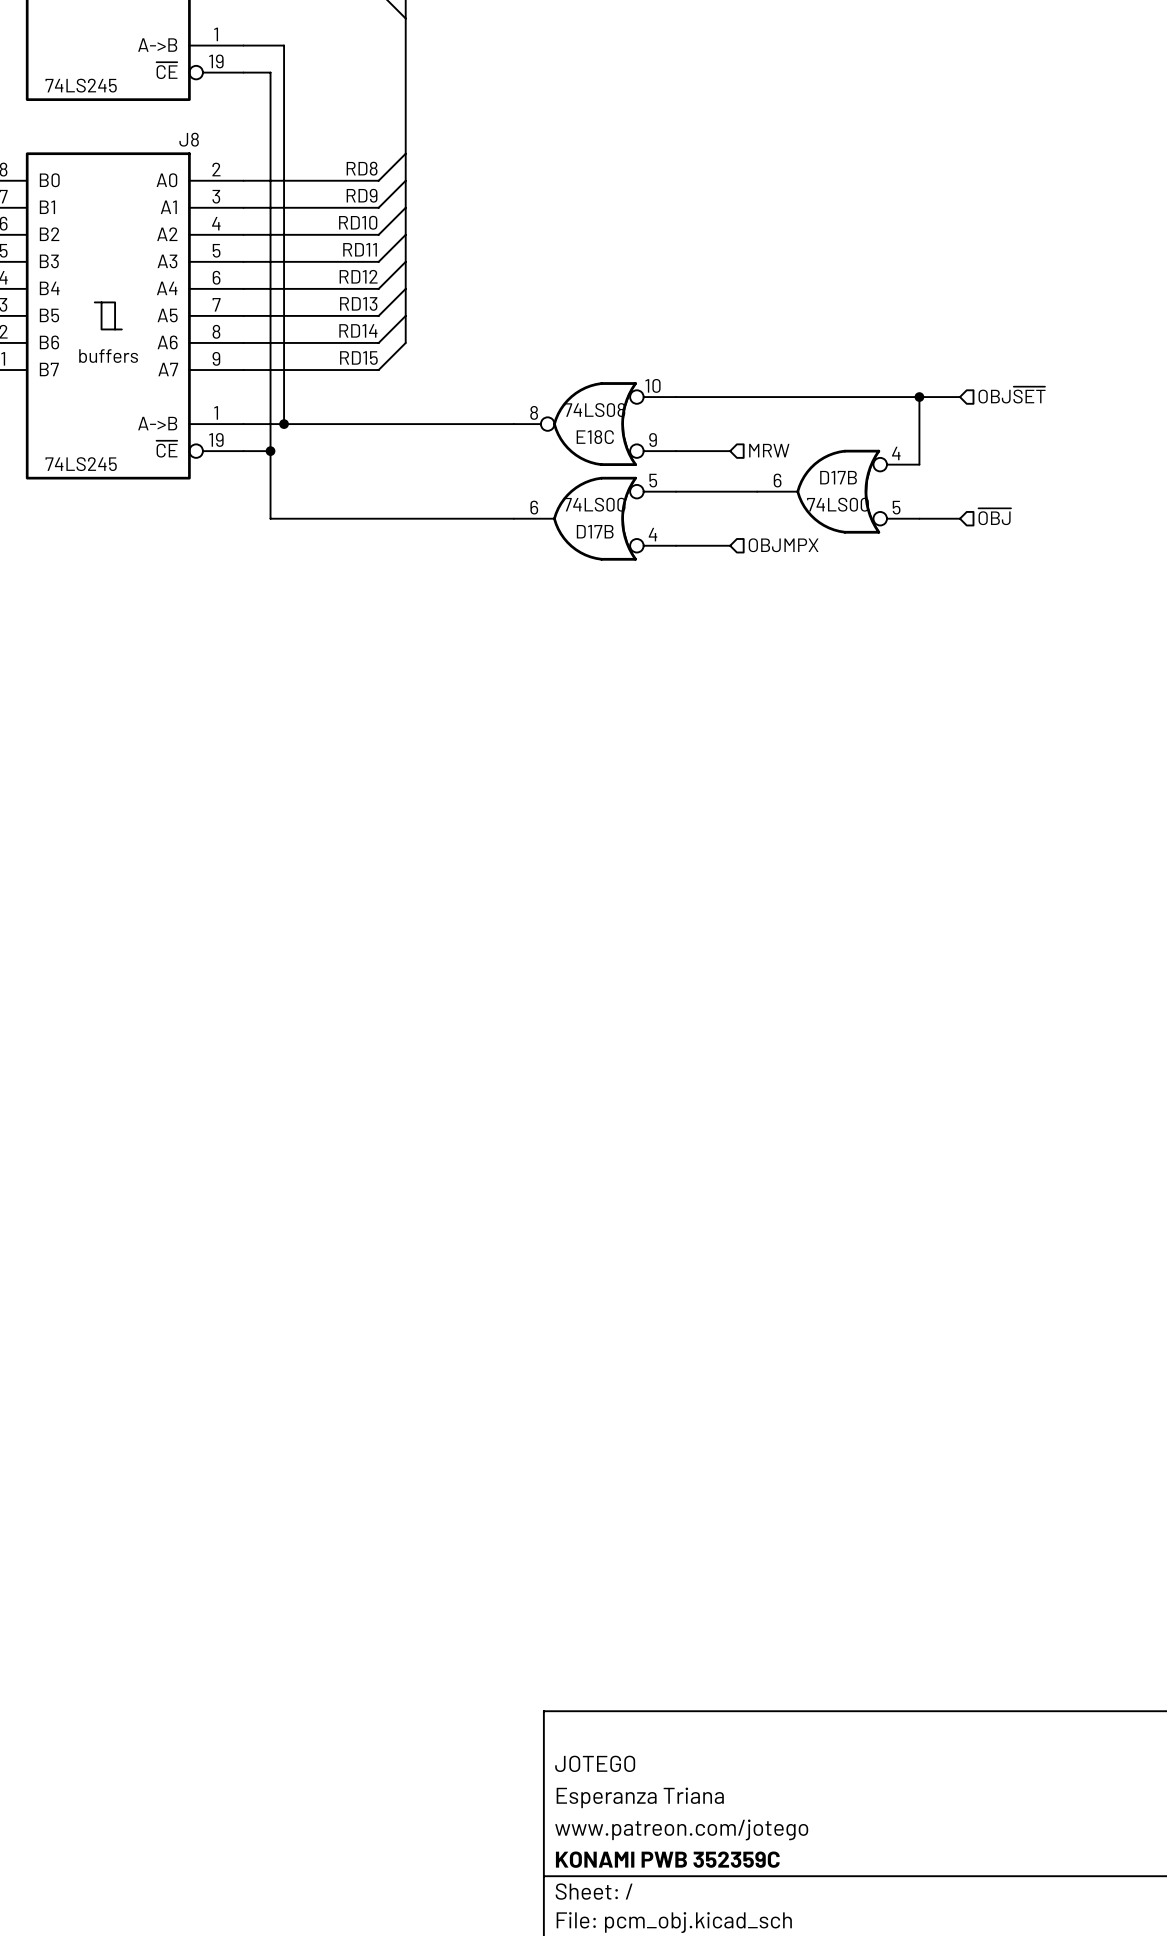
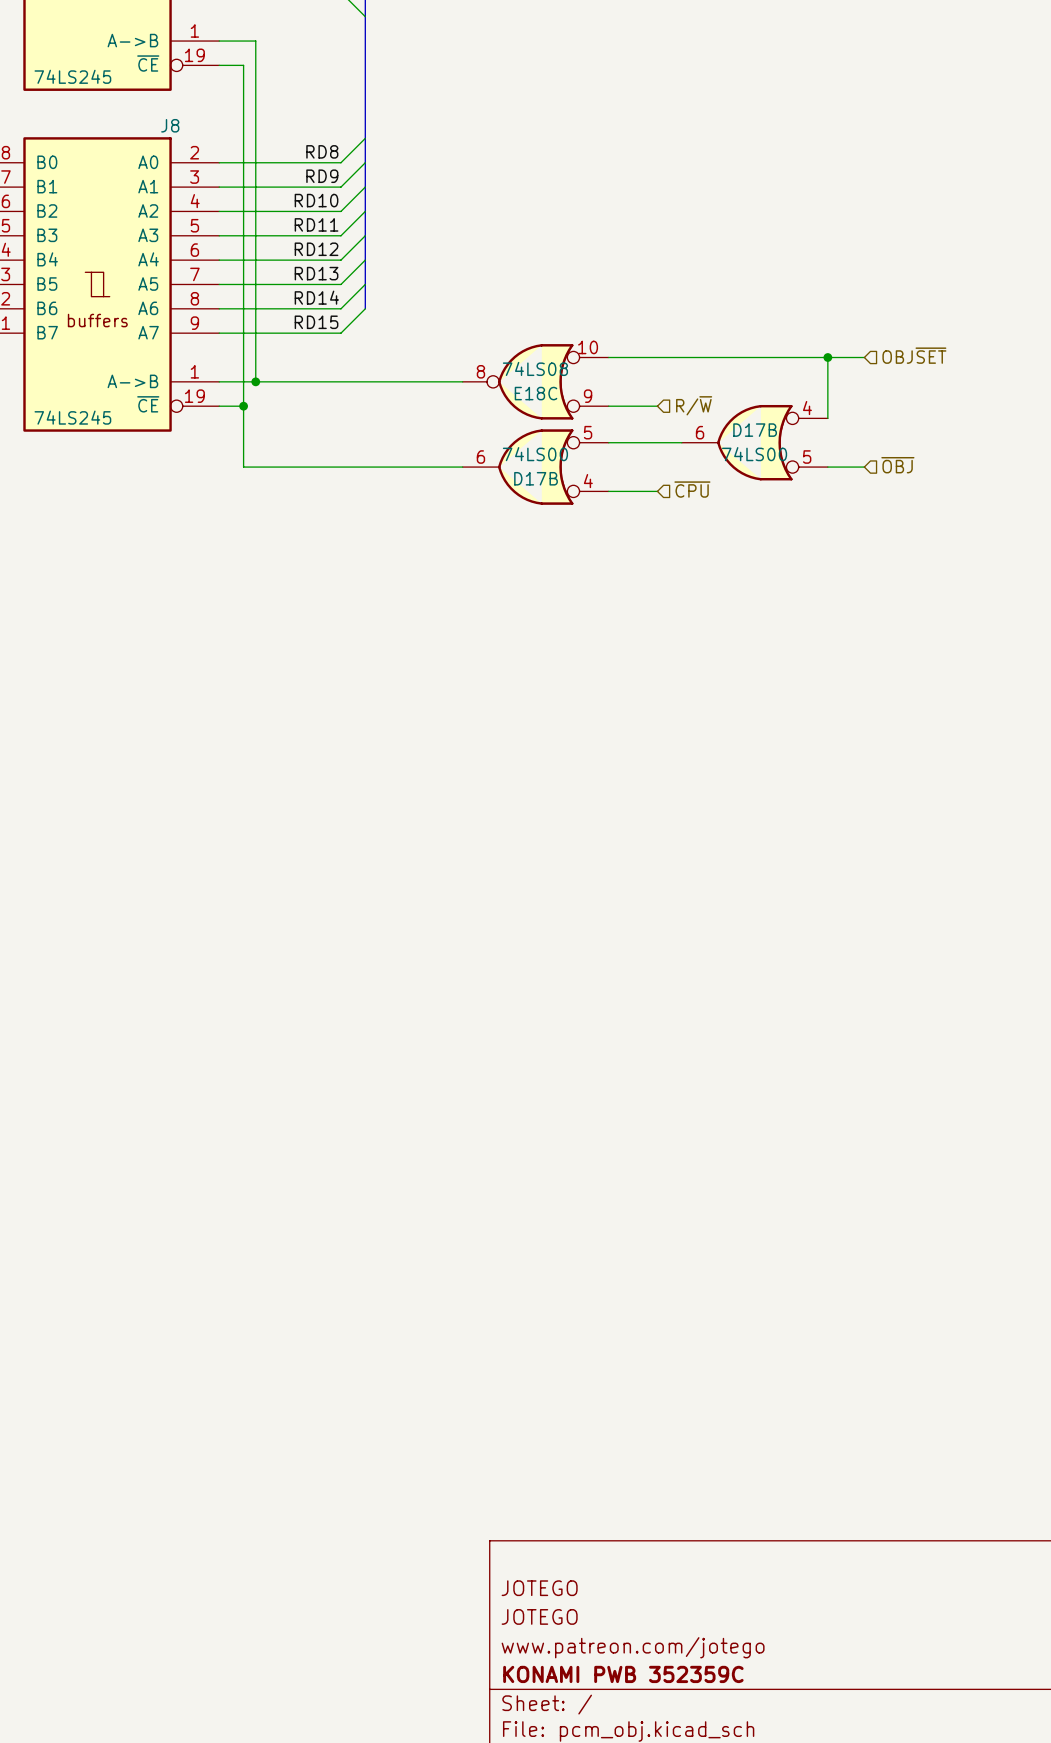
hierarchical label: MRW (769, 450) -> R/~{W} (694, 405)
hierarchical label: OBJMPX (783, 545) -> ~{CPU} (692, 489)
title block: Esperanza Triana (640, 1797) -> JOTEGO (539, 1616)

